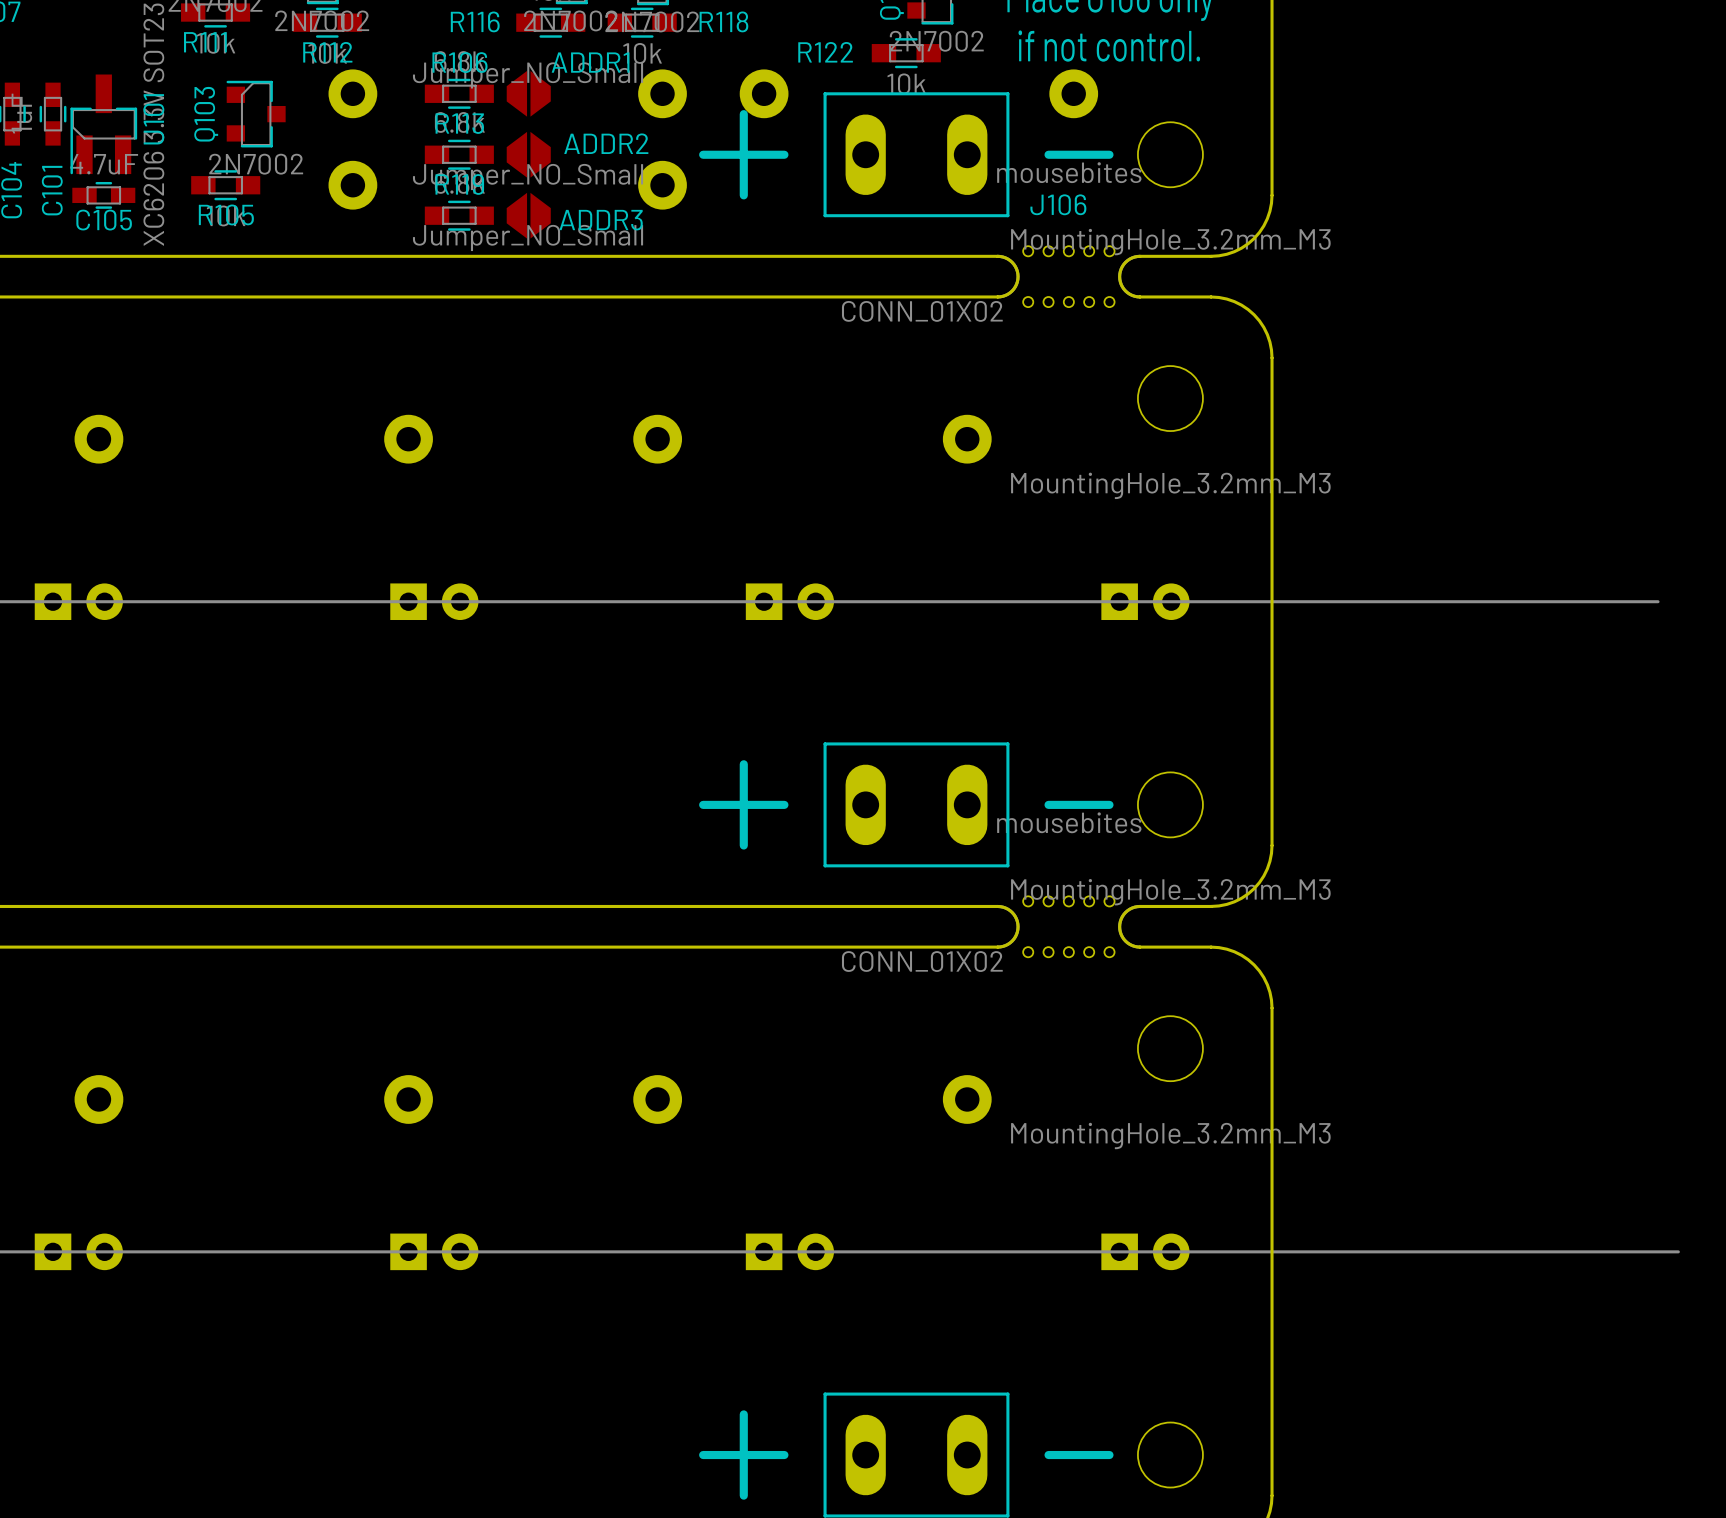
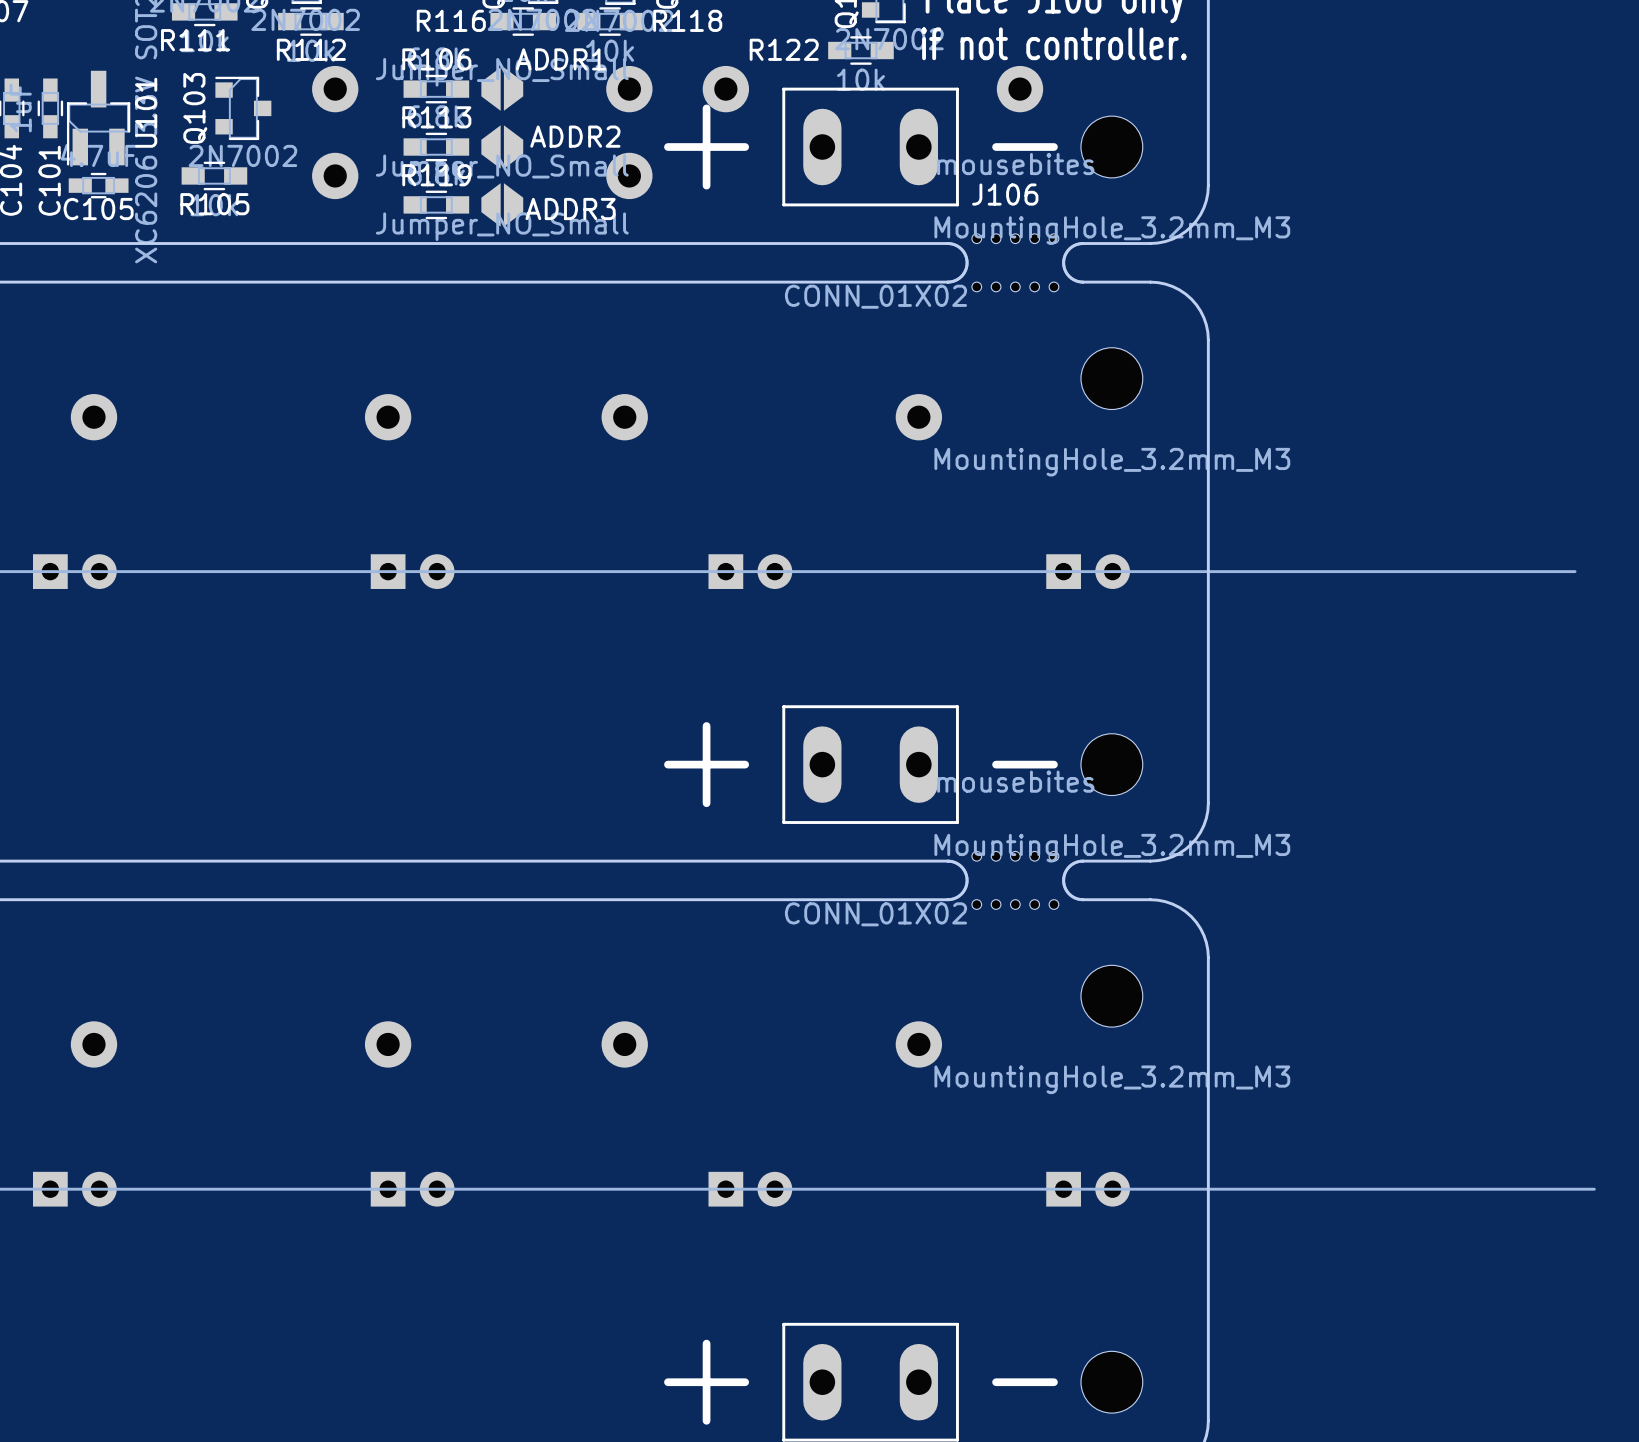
text: if not control. (1109, 46) -> if not controller. (1053, 43)

